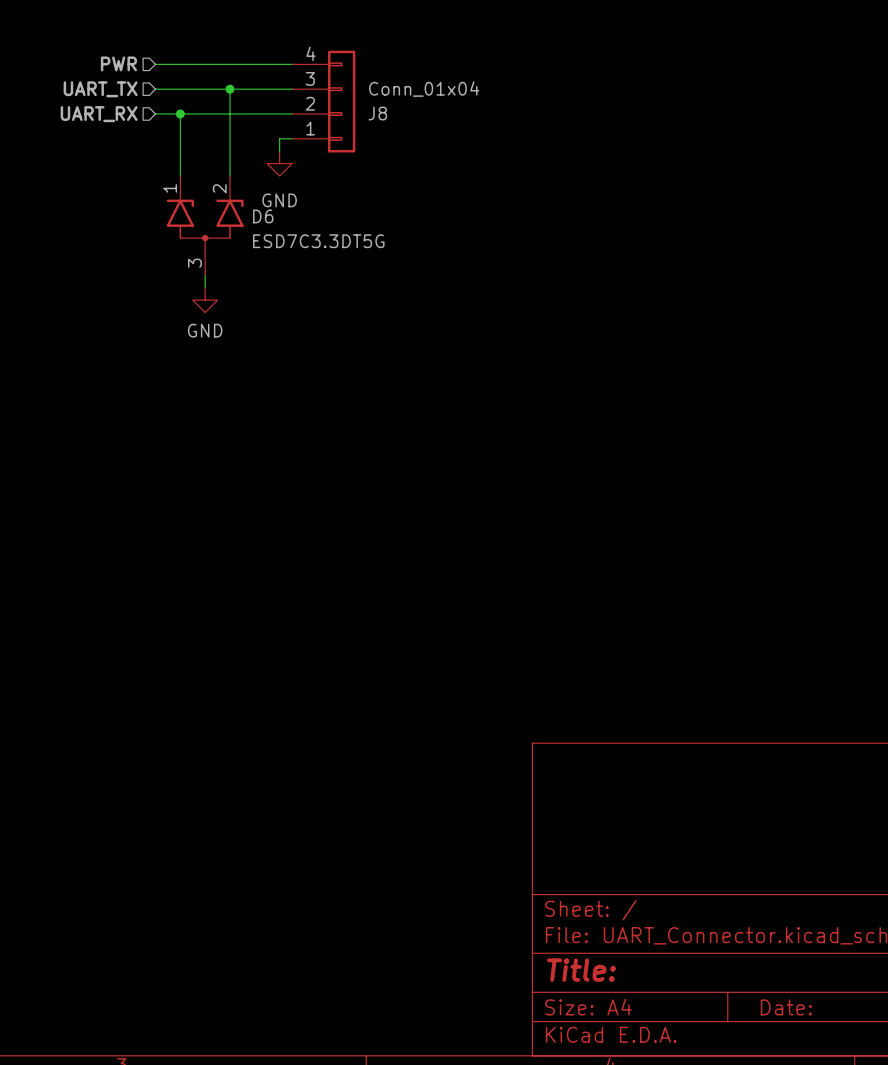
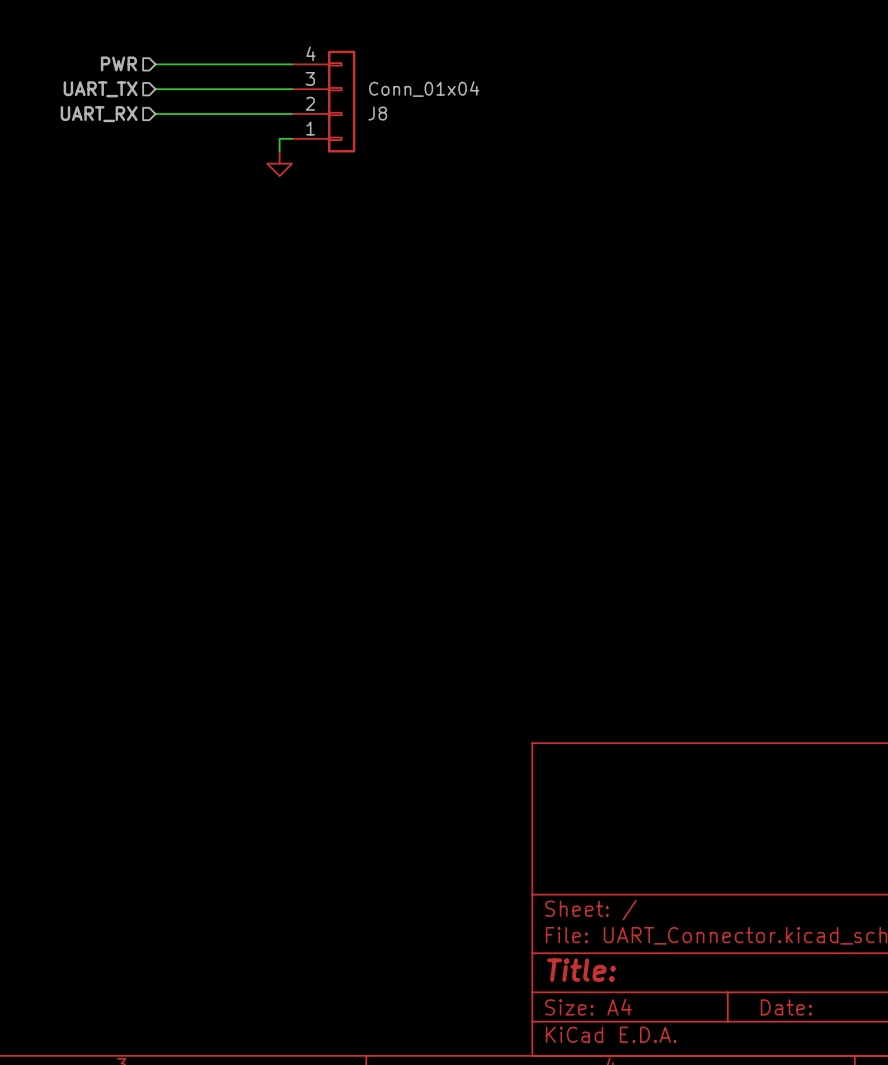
wire: (229, 89) (229, 176) -> none
junction: (229, 89) -> none
wire: (180, 114) (180, 176) -> none
junction: (180, 114) -> none
power symbol text: GND (279, 200) -> none
D6: ESD7C3.3DT5G (205, 225) -> none
wire: (205, 275) (205, 287) -> none
power symbol: GND (205, 300) -> none

